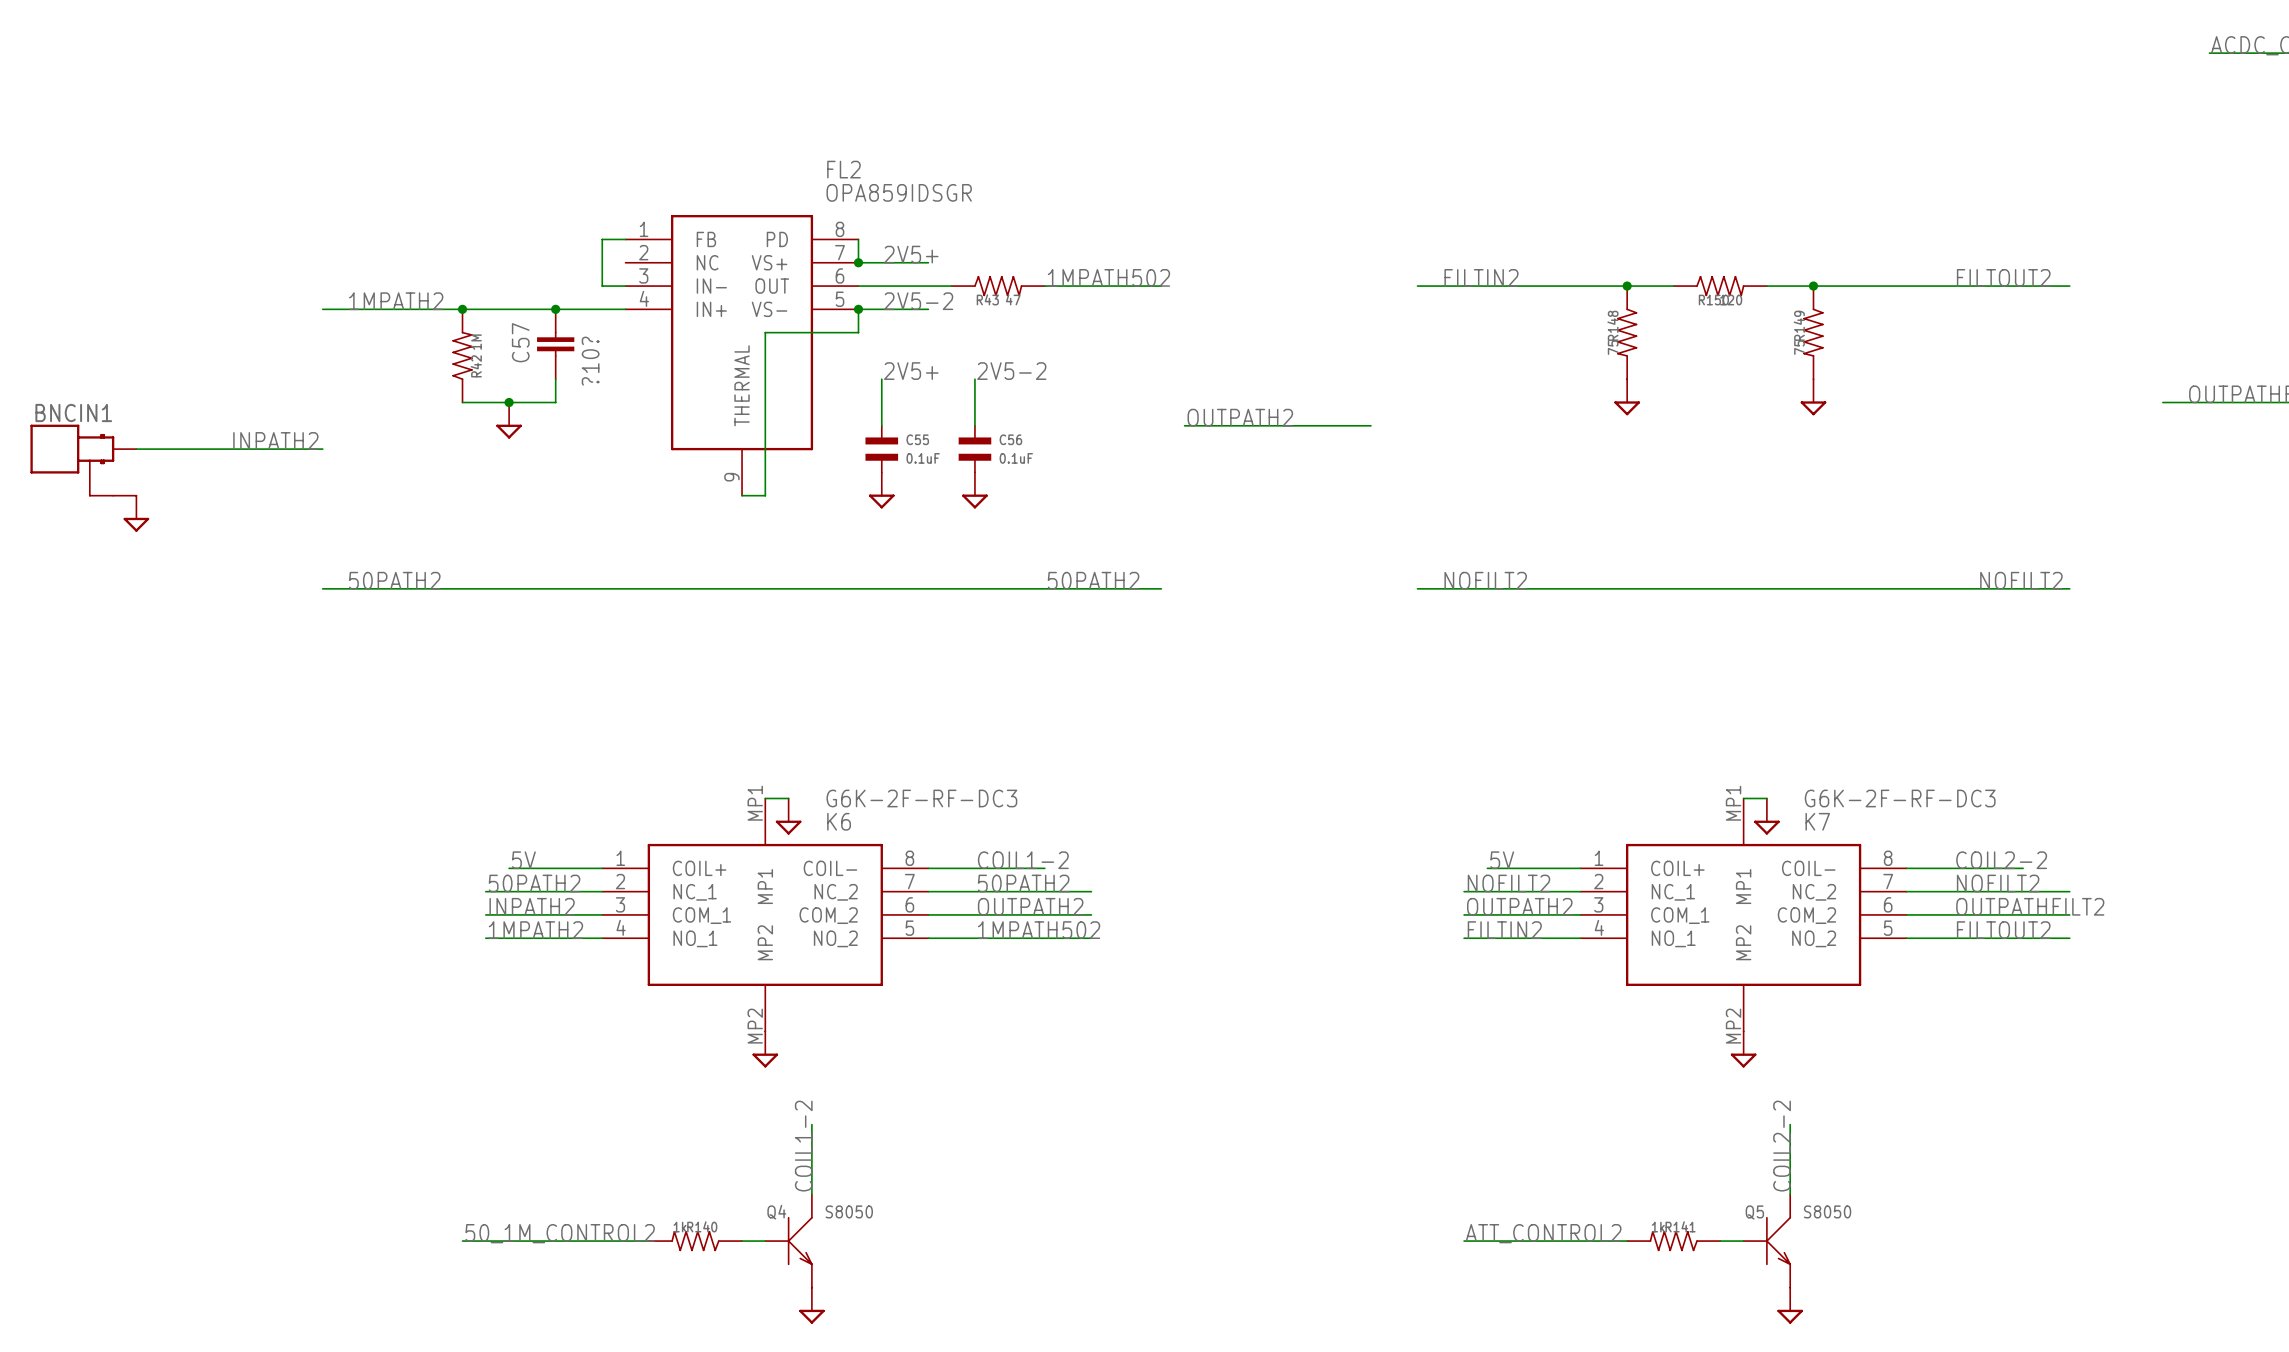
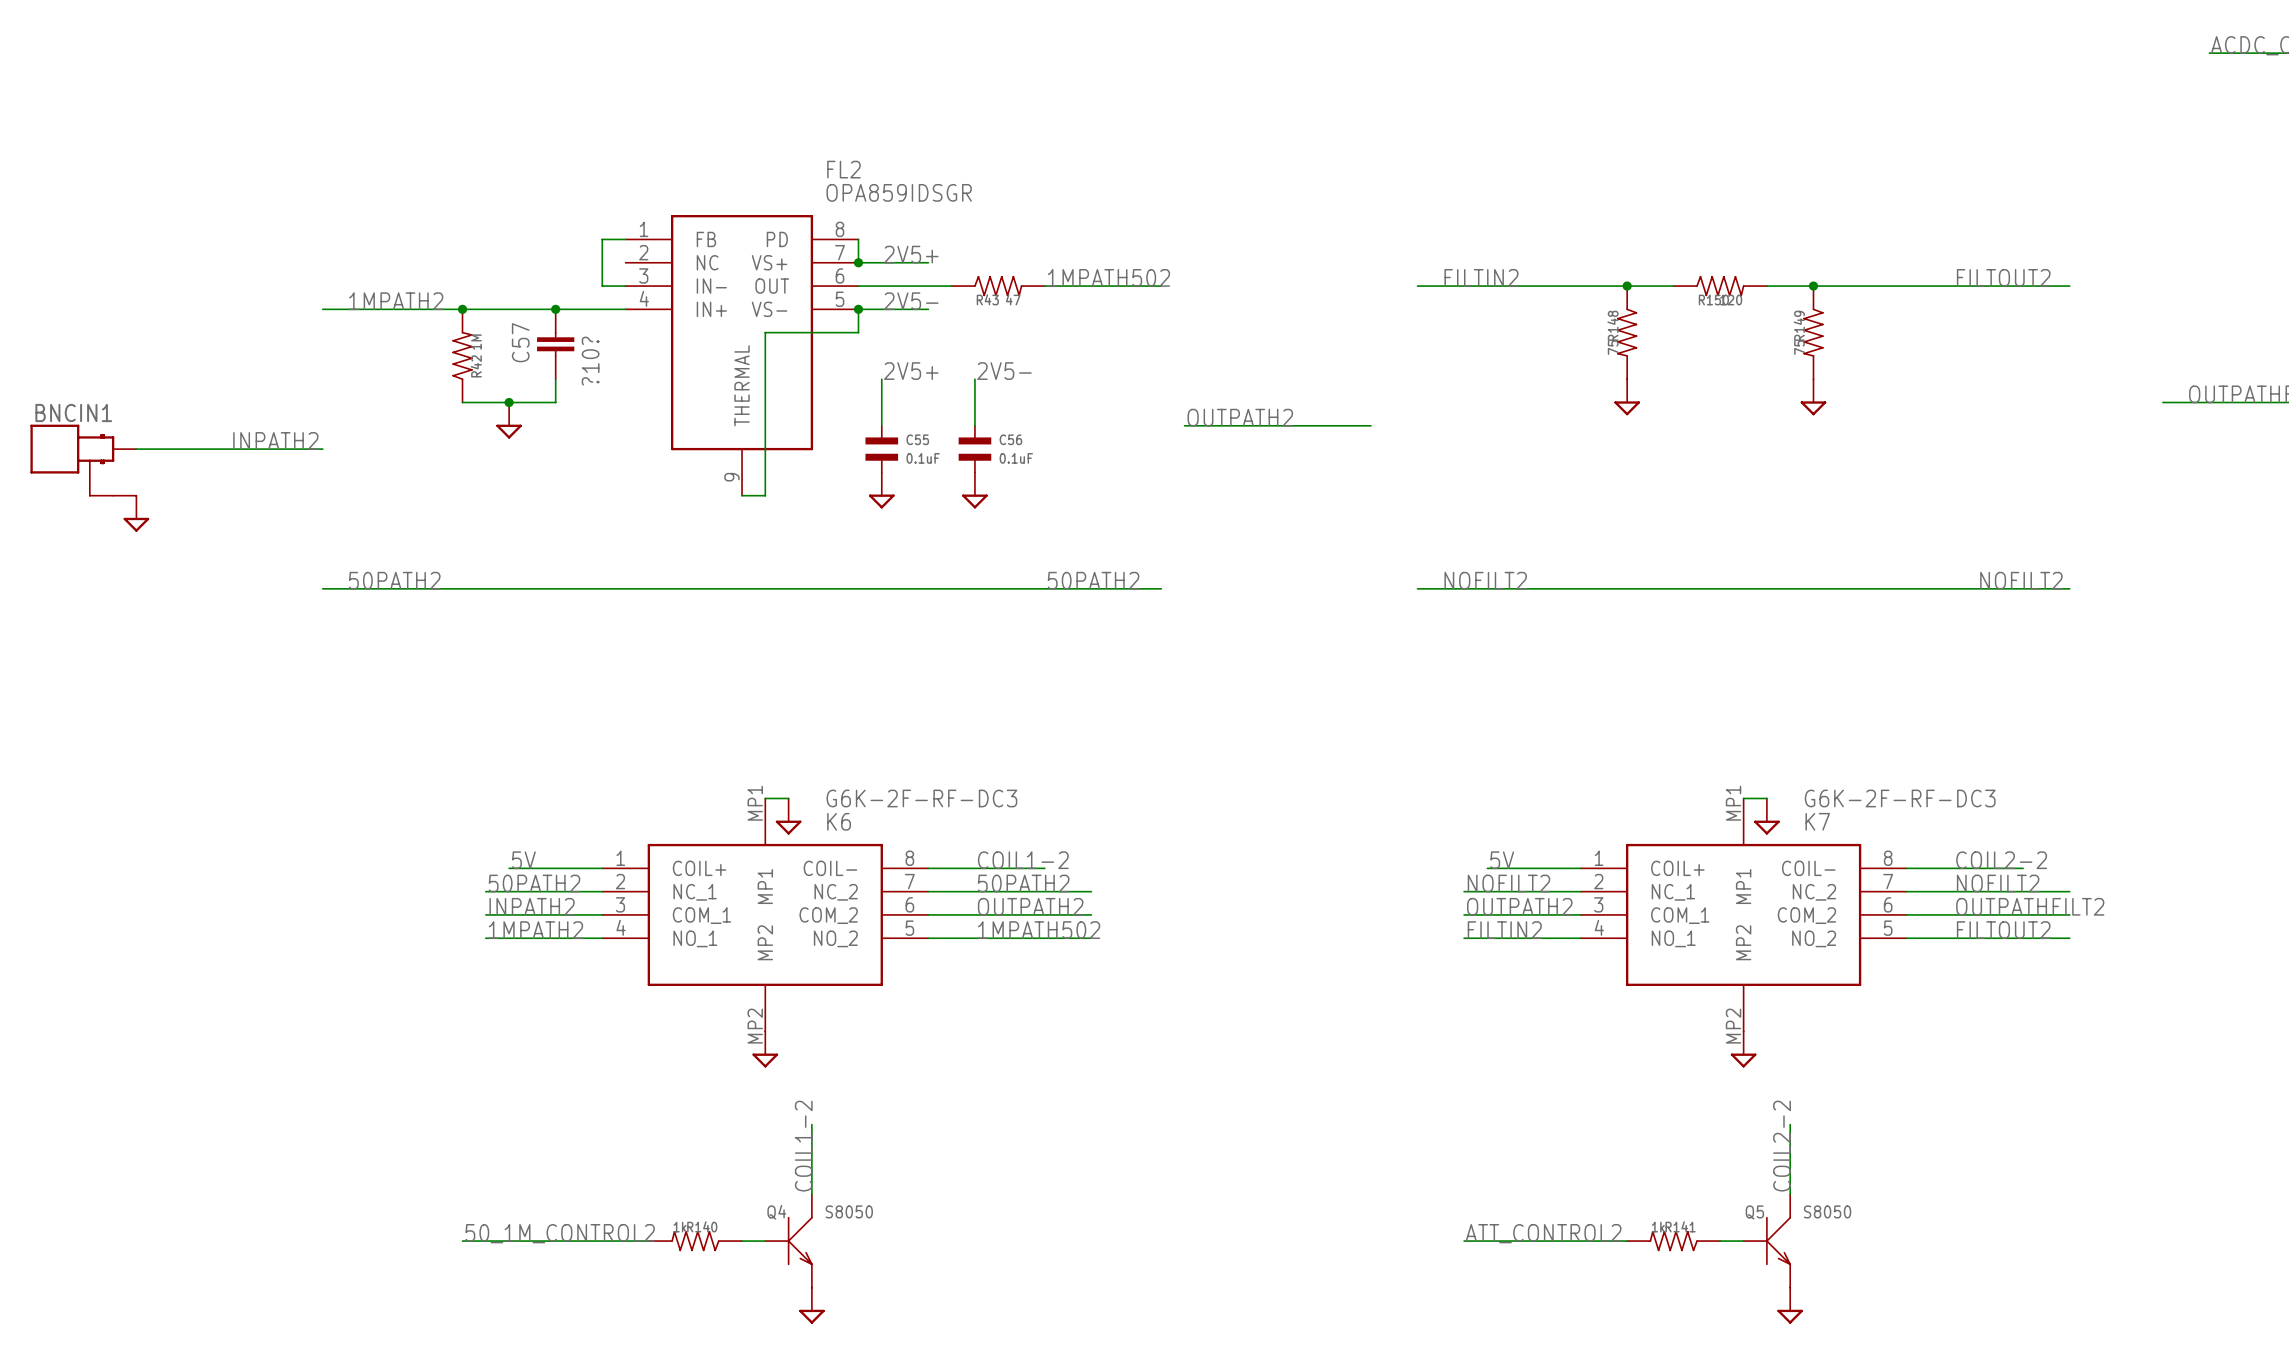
label: 2V5-2 (918, 301) -> 2V5- (911, 301)
label: 2V5-2 (1011, 371) -> 2V5- (1004, 371)

